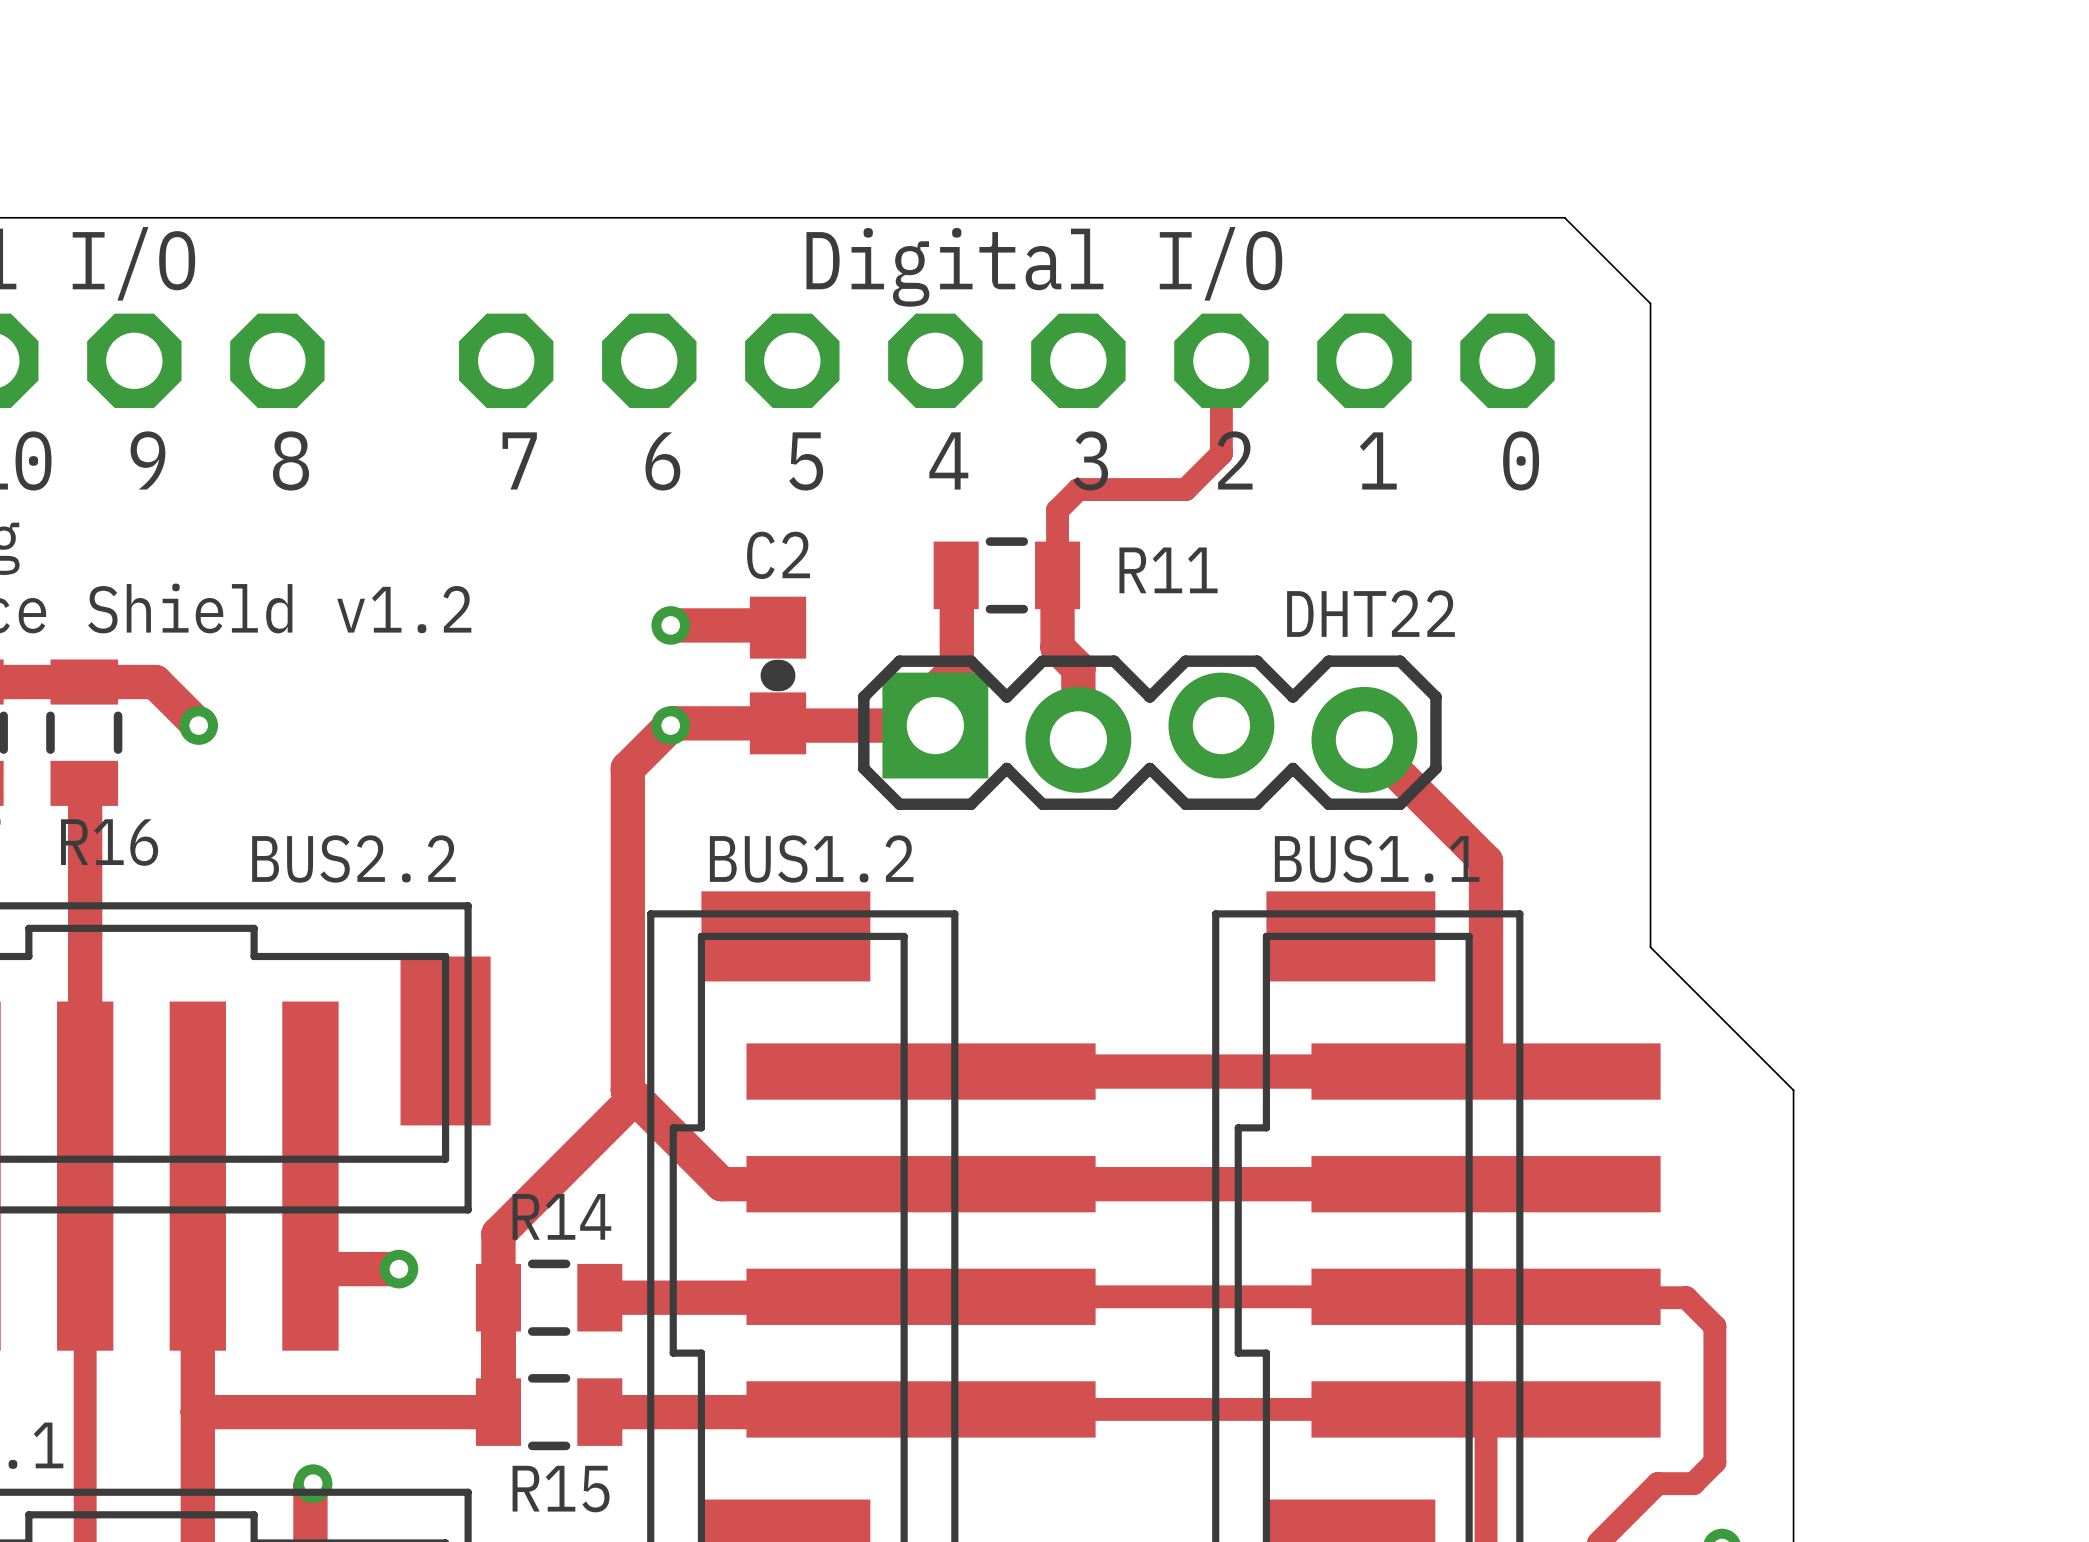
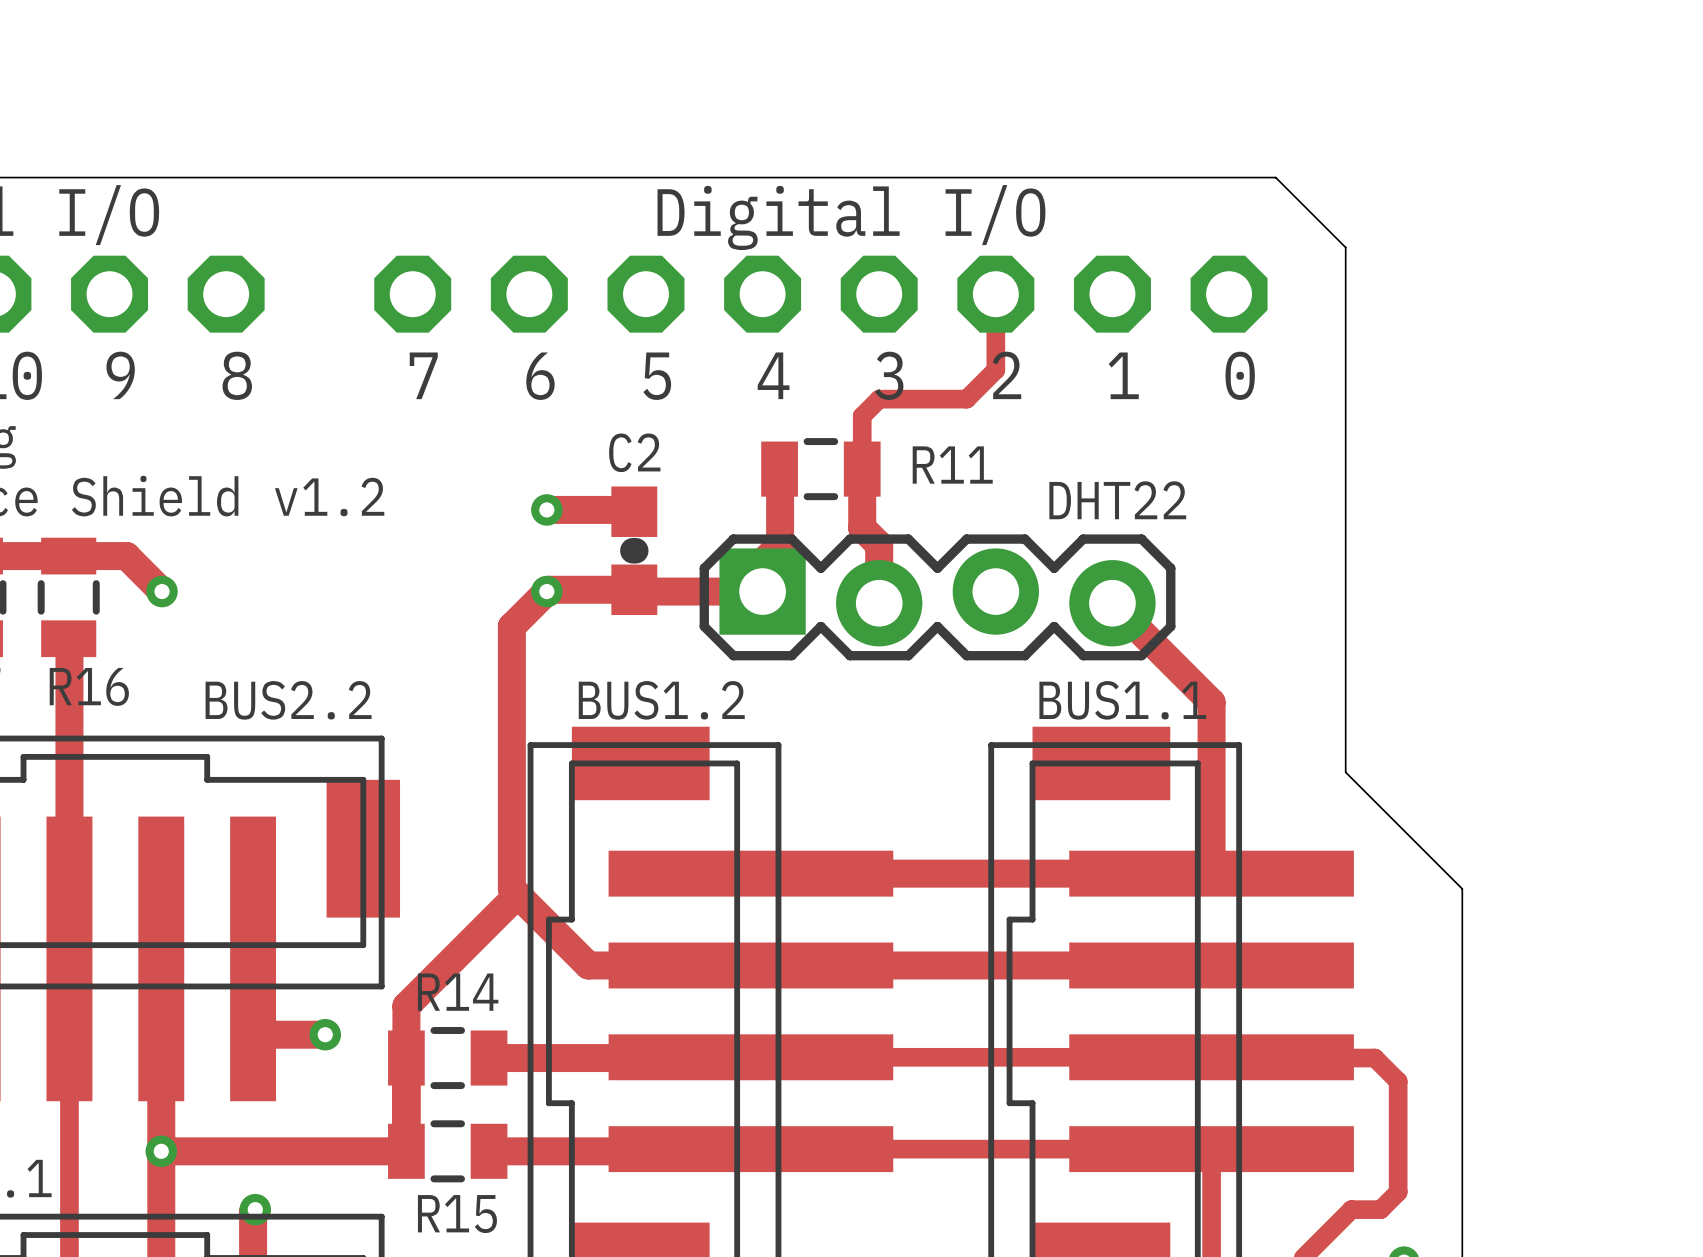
via: none -> (161, 1151)

